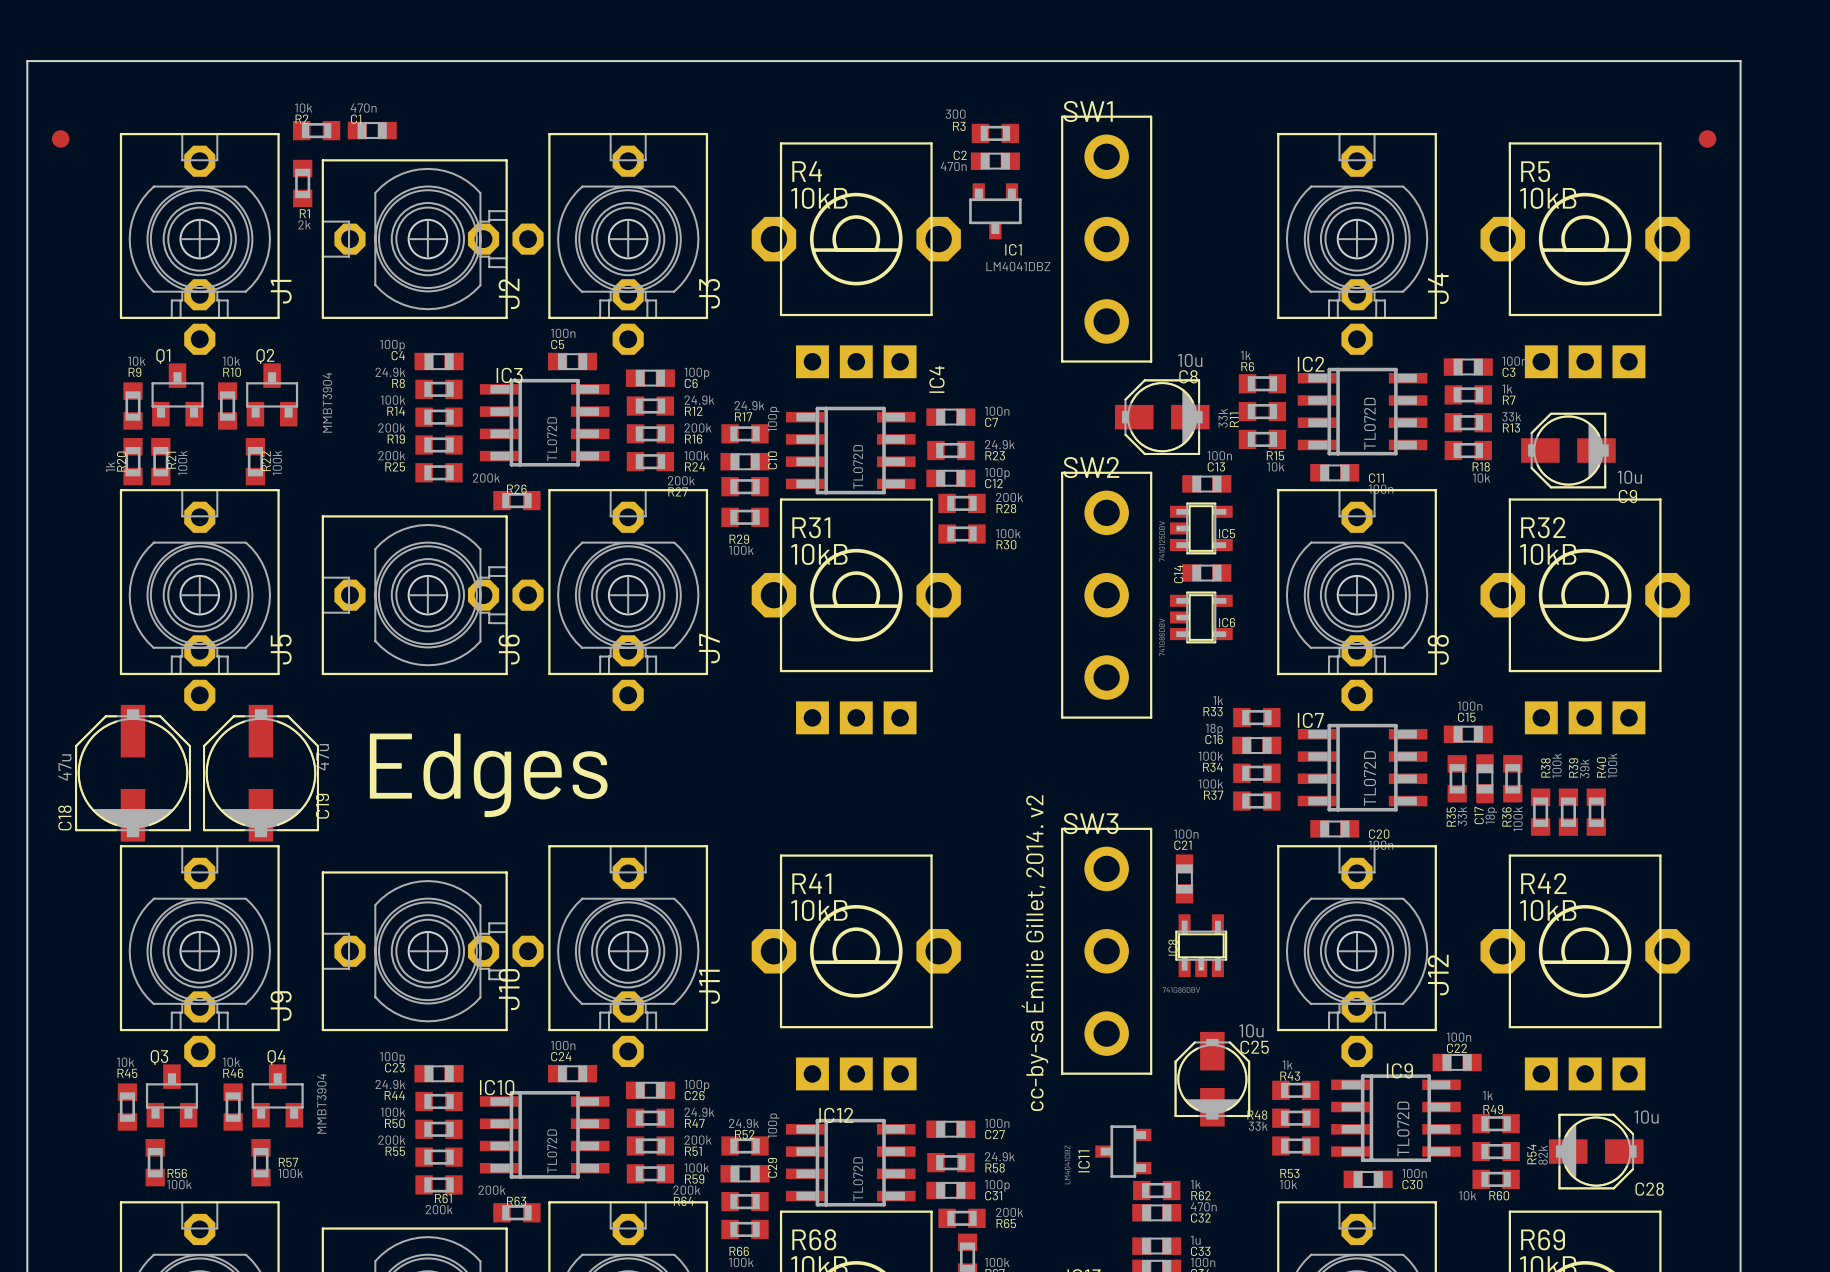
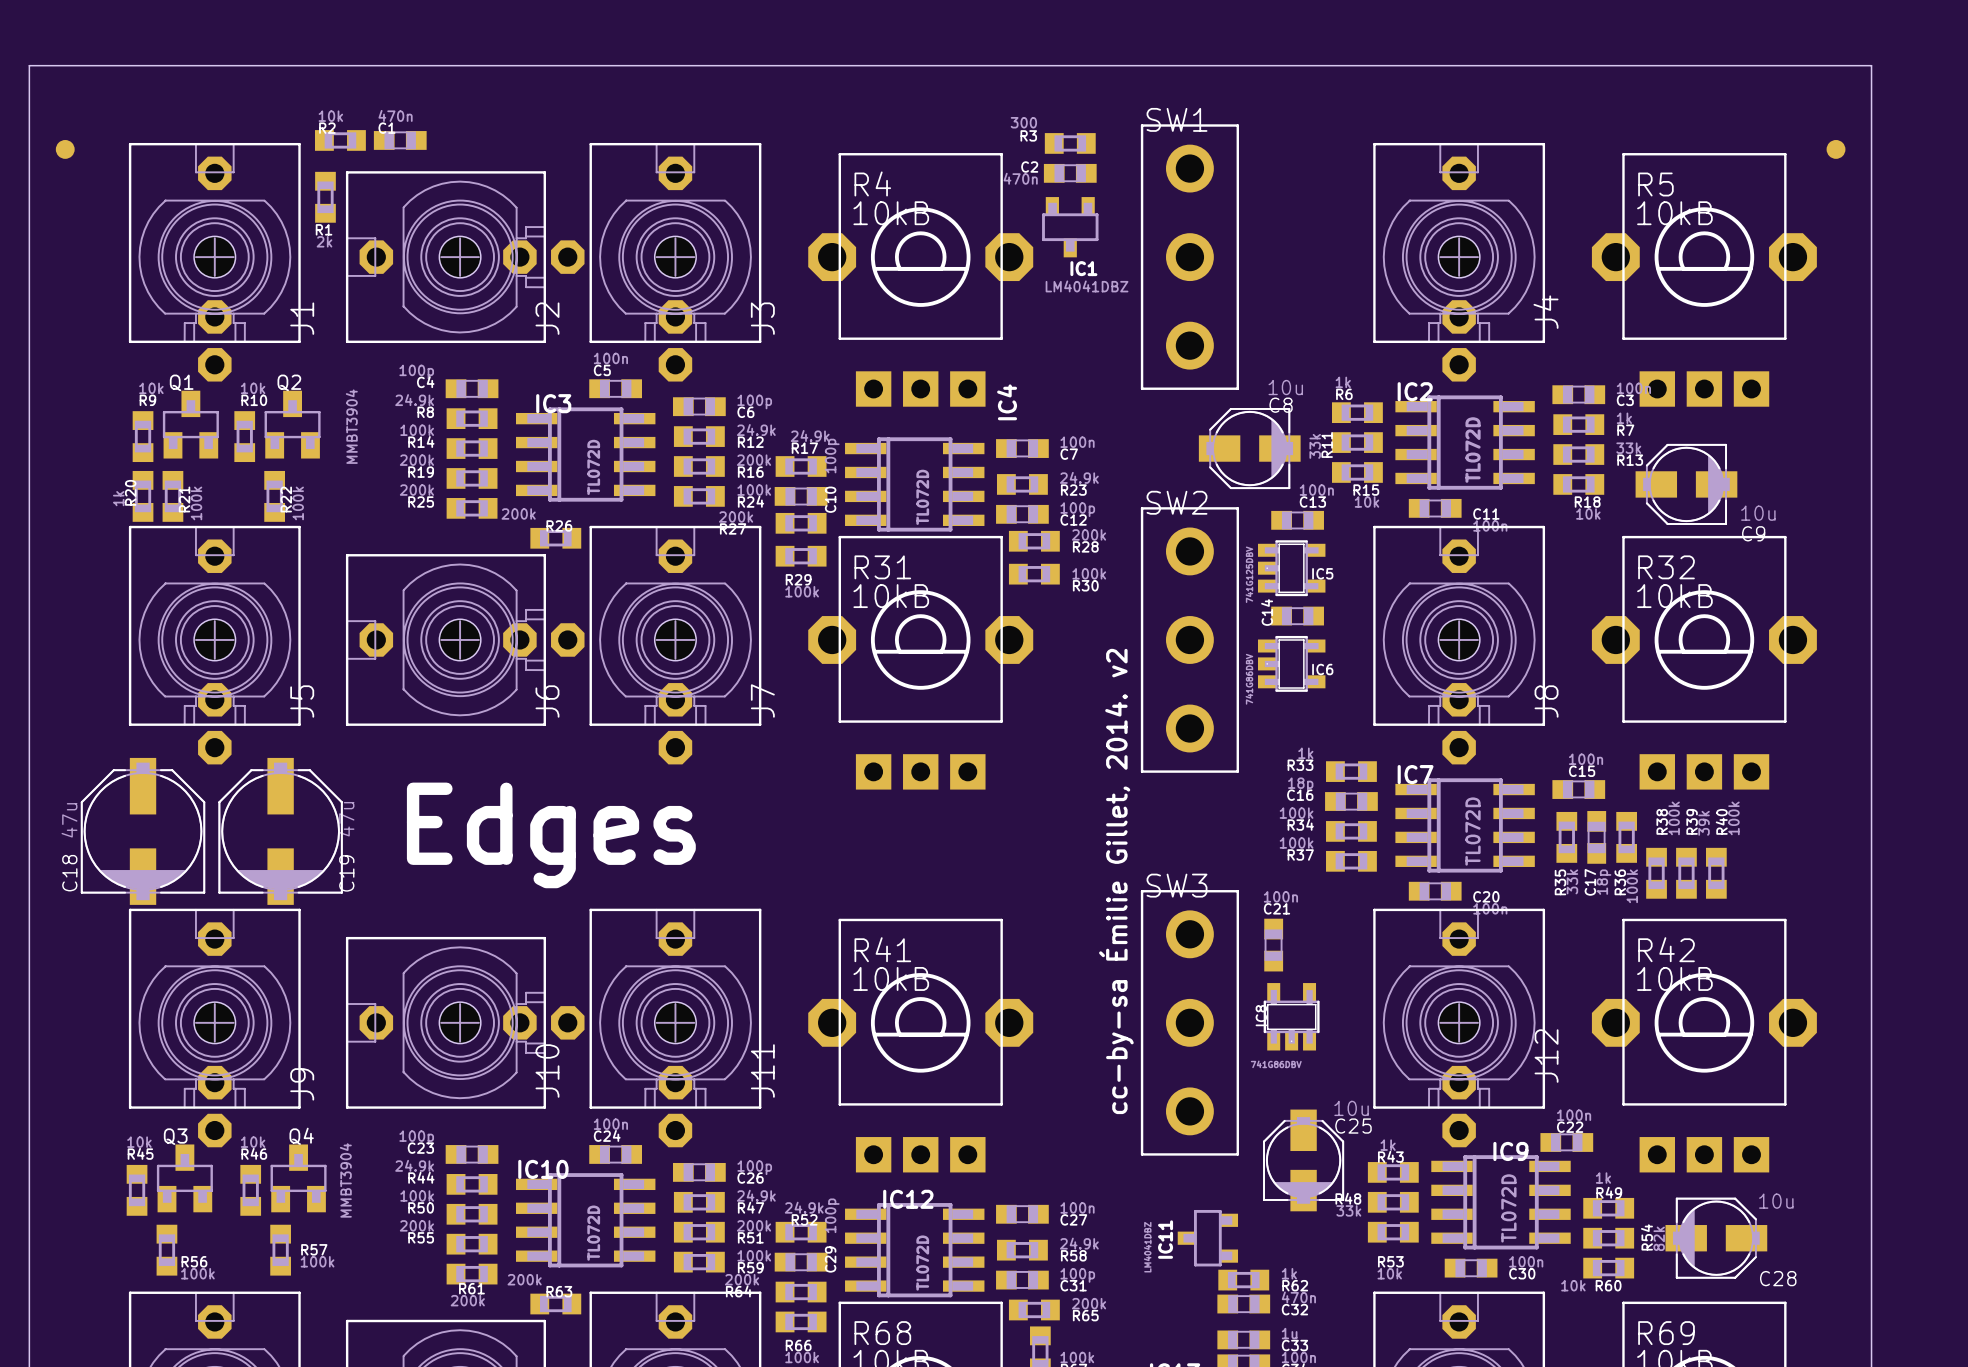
text position: cc-by-sa Émilie Gillet, 2014. v2 (1034, 953) -> cc-by-sa Émilie Gillet, 2014. v2 (1116, 881)

